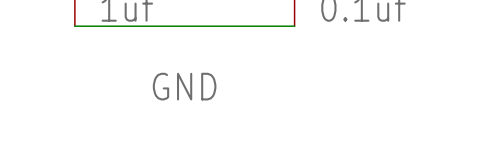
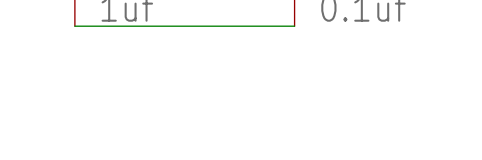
label: GND (184, 86) -> none

